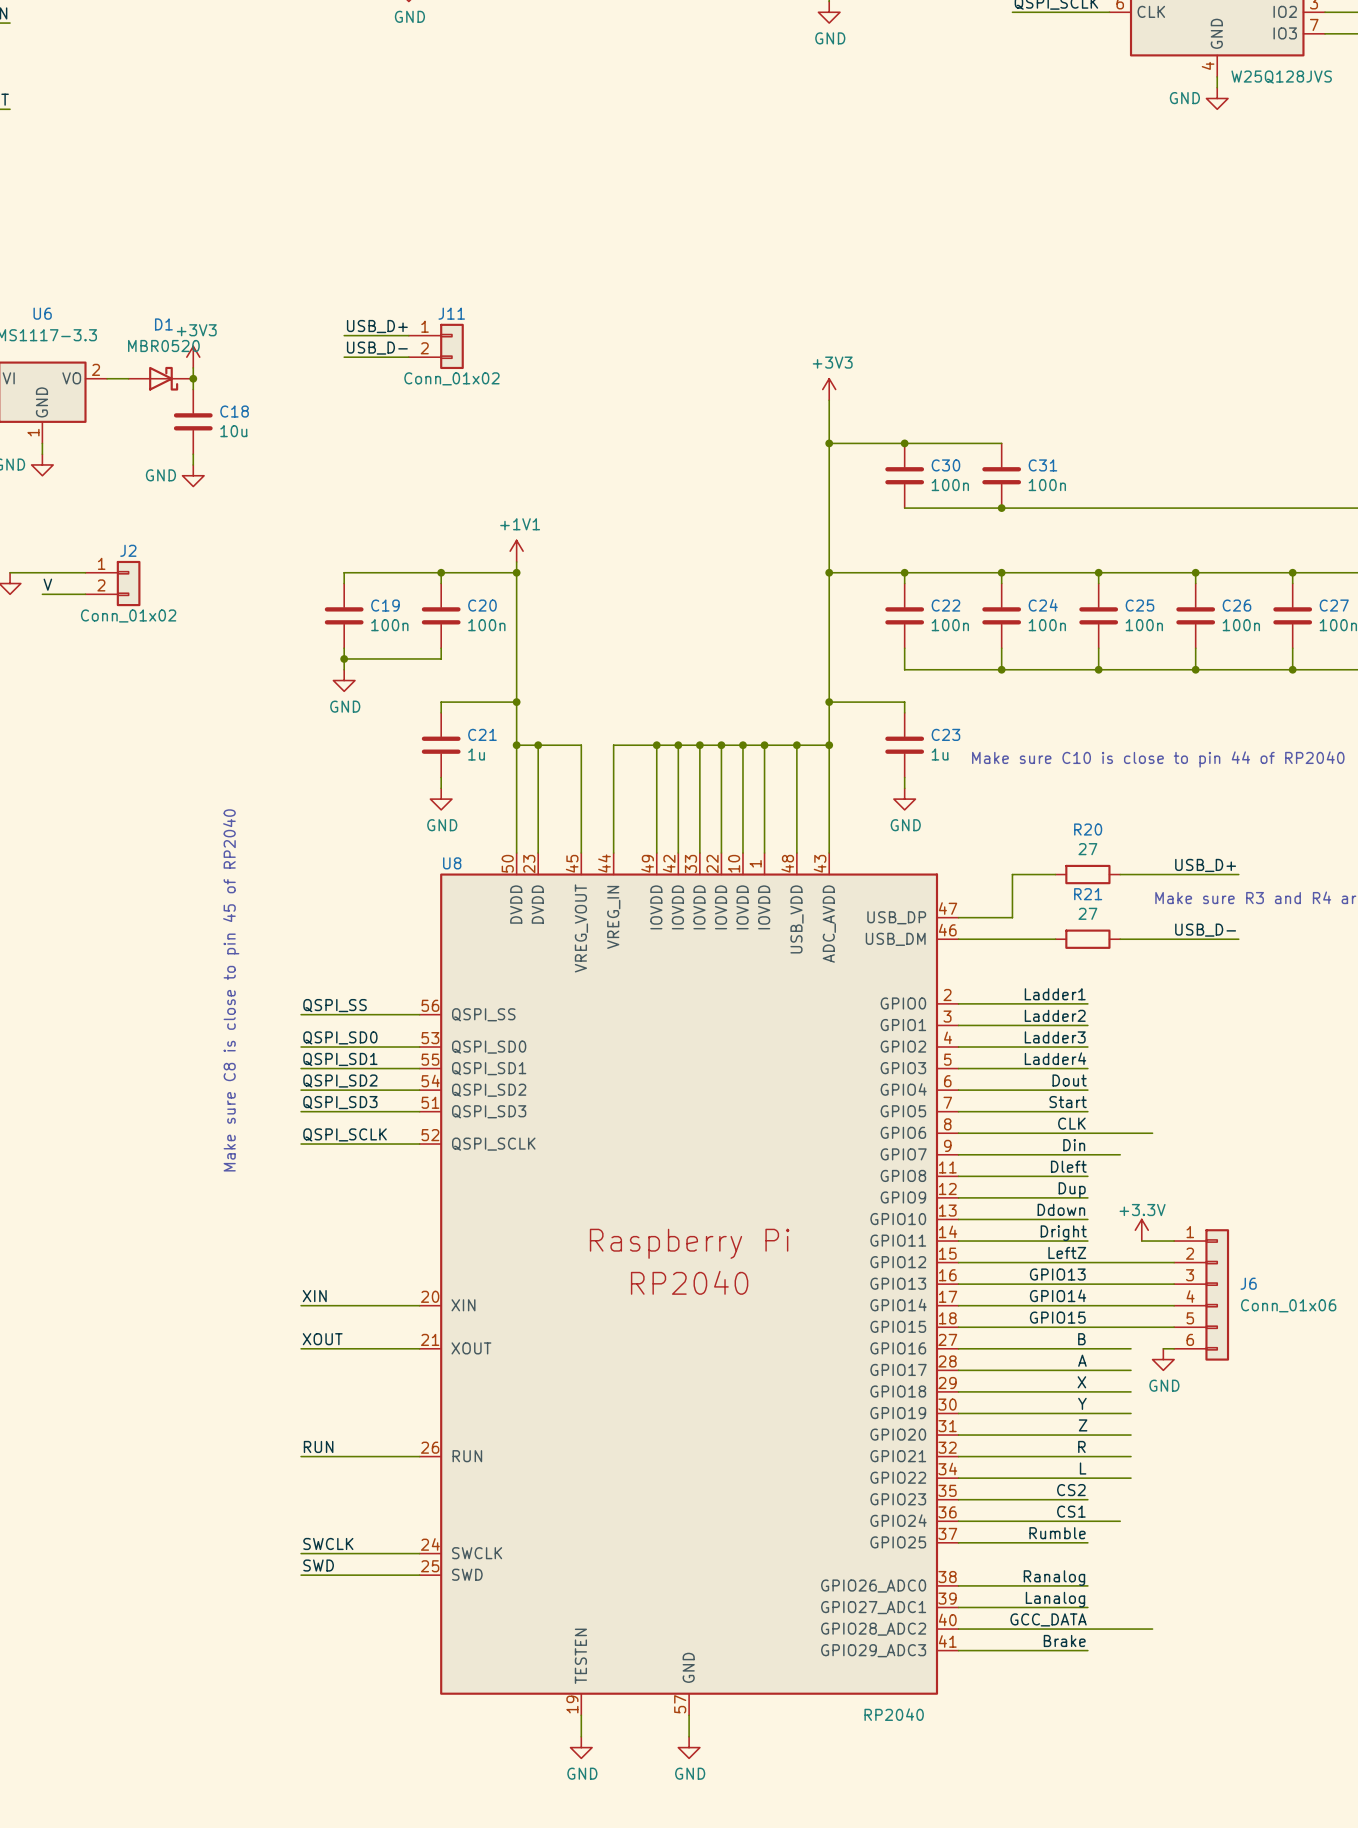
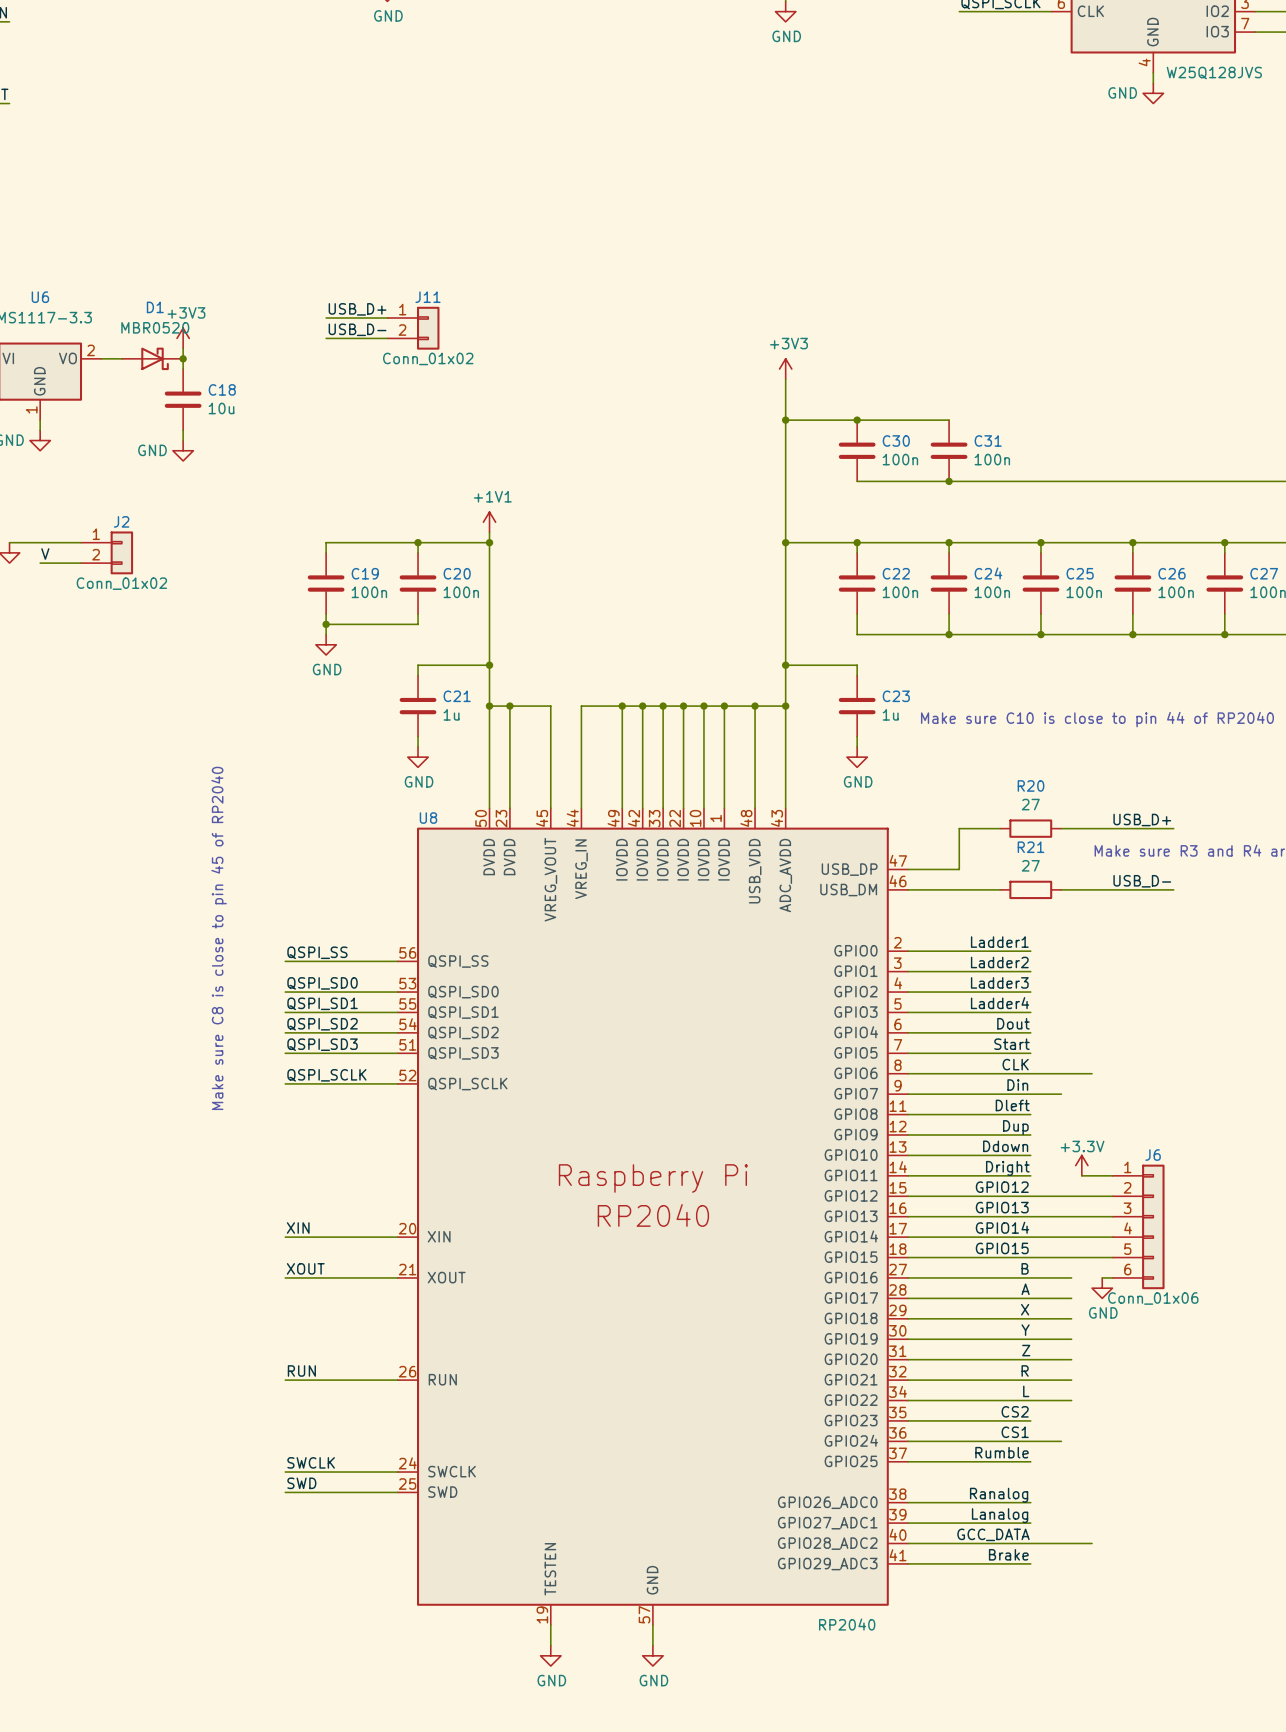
label: LeftZ (1067, 1252) -> GPIO12 (1002, 1187)
J6 name position: J6 (1248, 1283) -> J6 (1153, 1155)
J6 value position: Conn_01x06 (1288, 1305) -> Conn_01x06 (1153, 1298)

